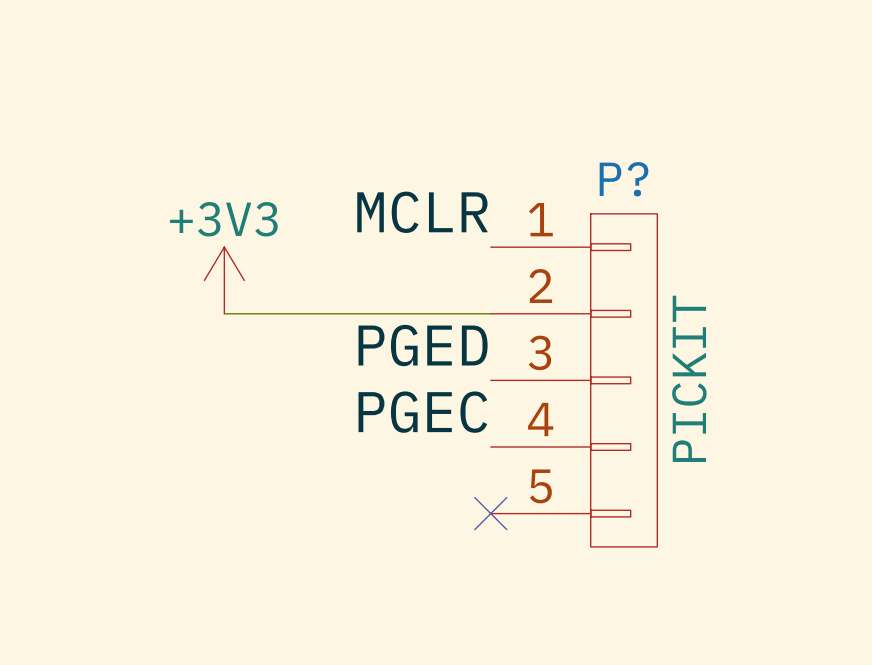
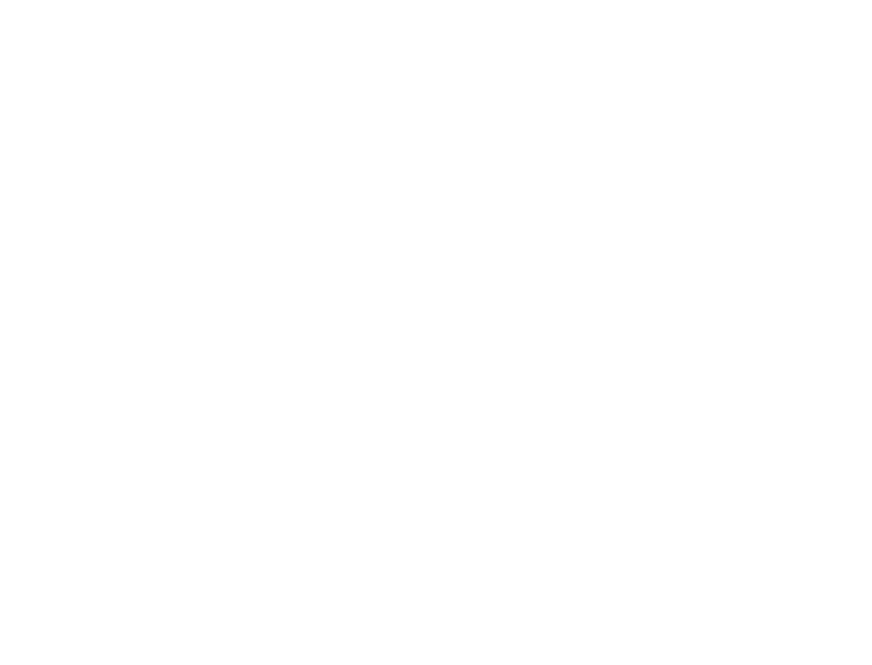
label: MCLR (422, 212) -> none
power symbol: +3V3 (224, 280) -> none
wire: (224, 313) (490, 313) -> none
label: PGED (423, 345) -> none
P?: PICKIT (574, 380) -> none
label: PGEC (422, 412) -> none
no-connect mark: (490, 513) -> none

